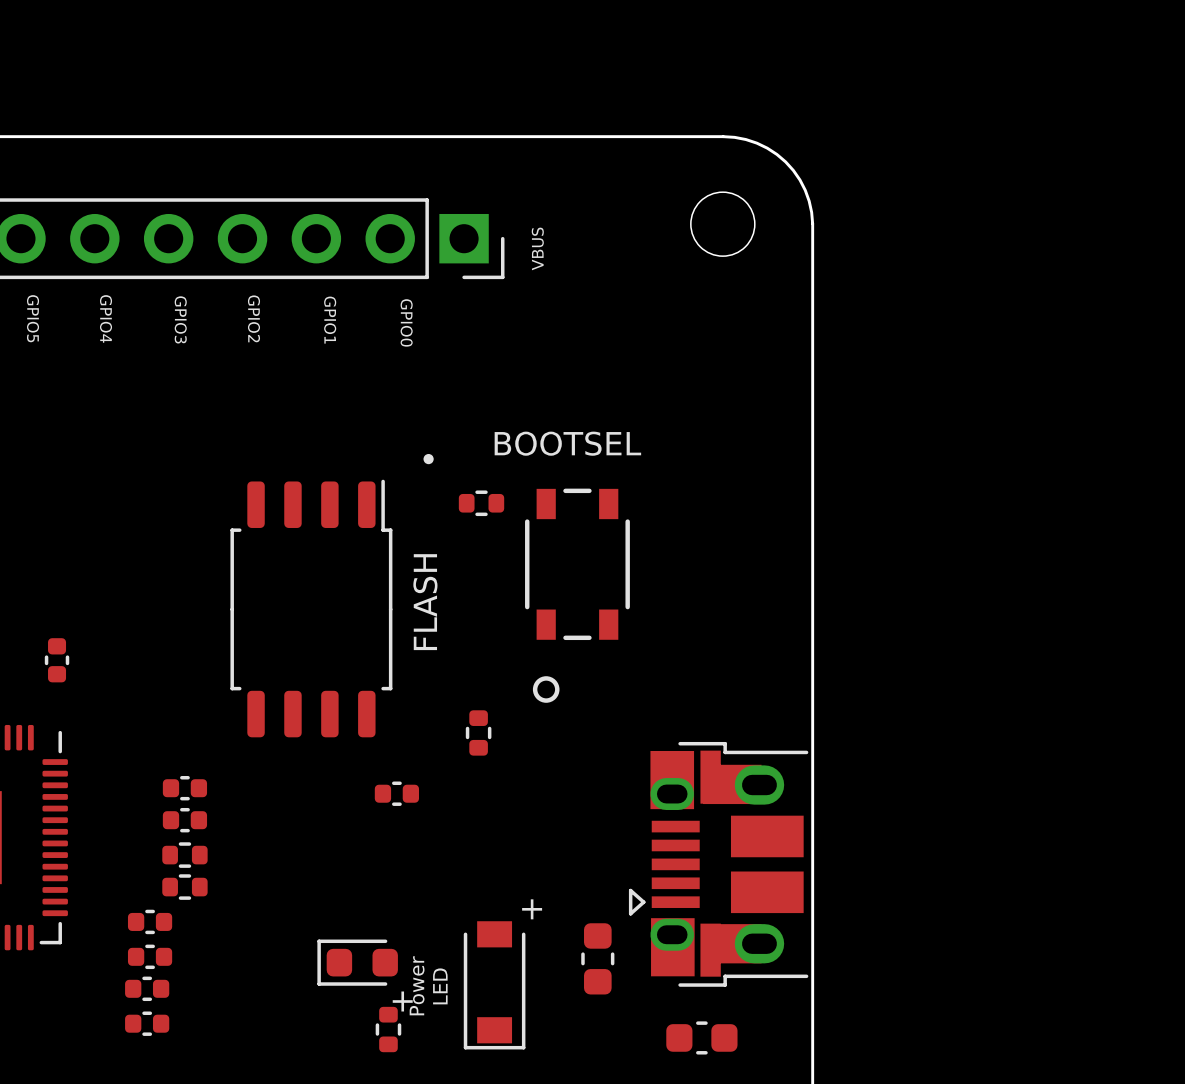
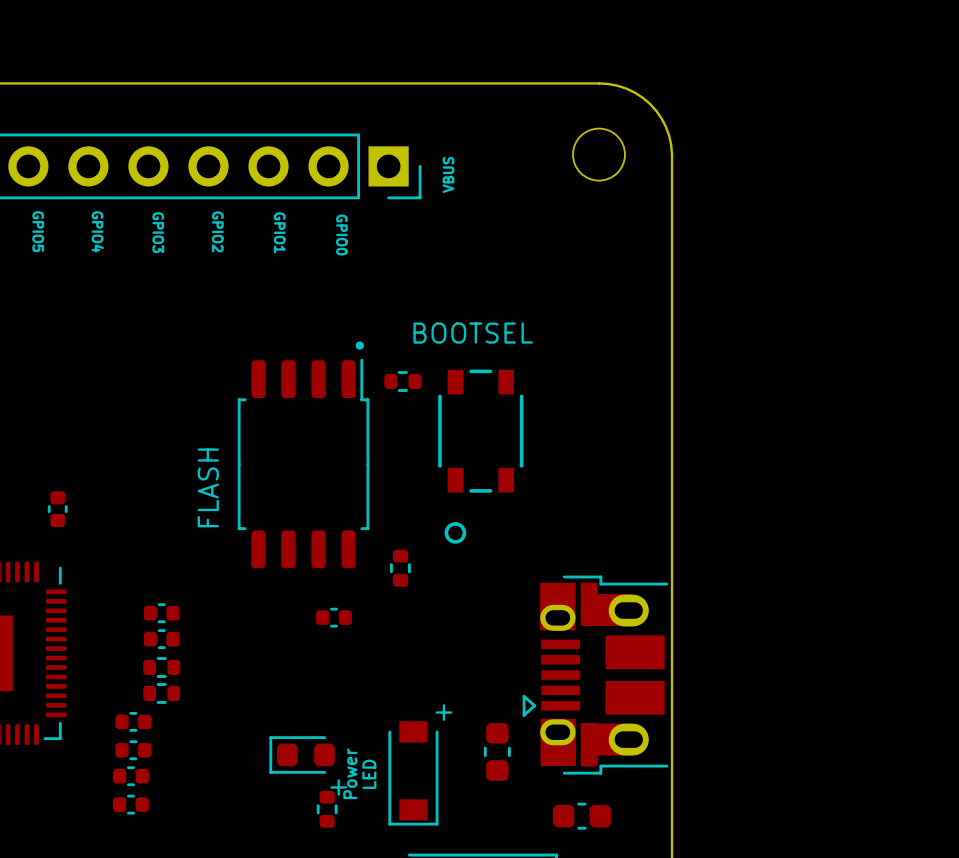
text position: FLASH (425, 602) -> FLASH (208, 487)
part position: (311, 608) -> (303, 463)

